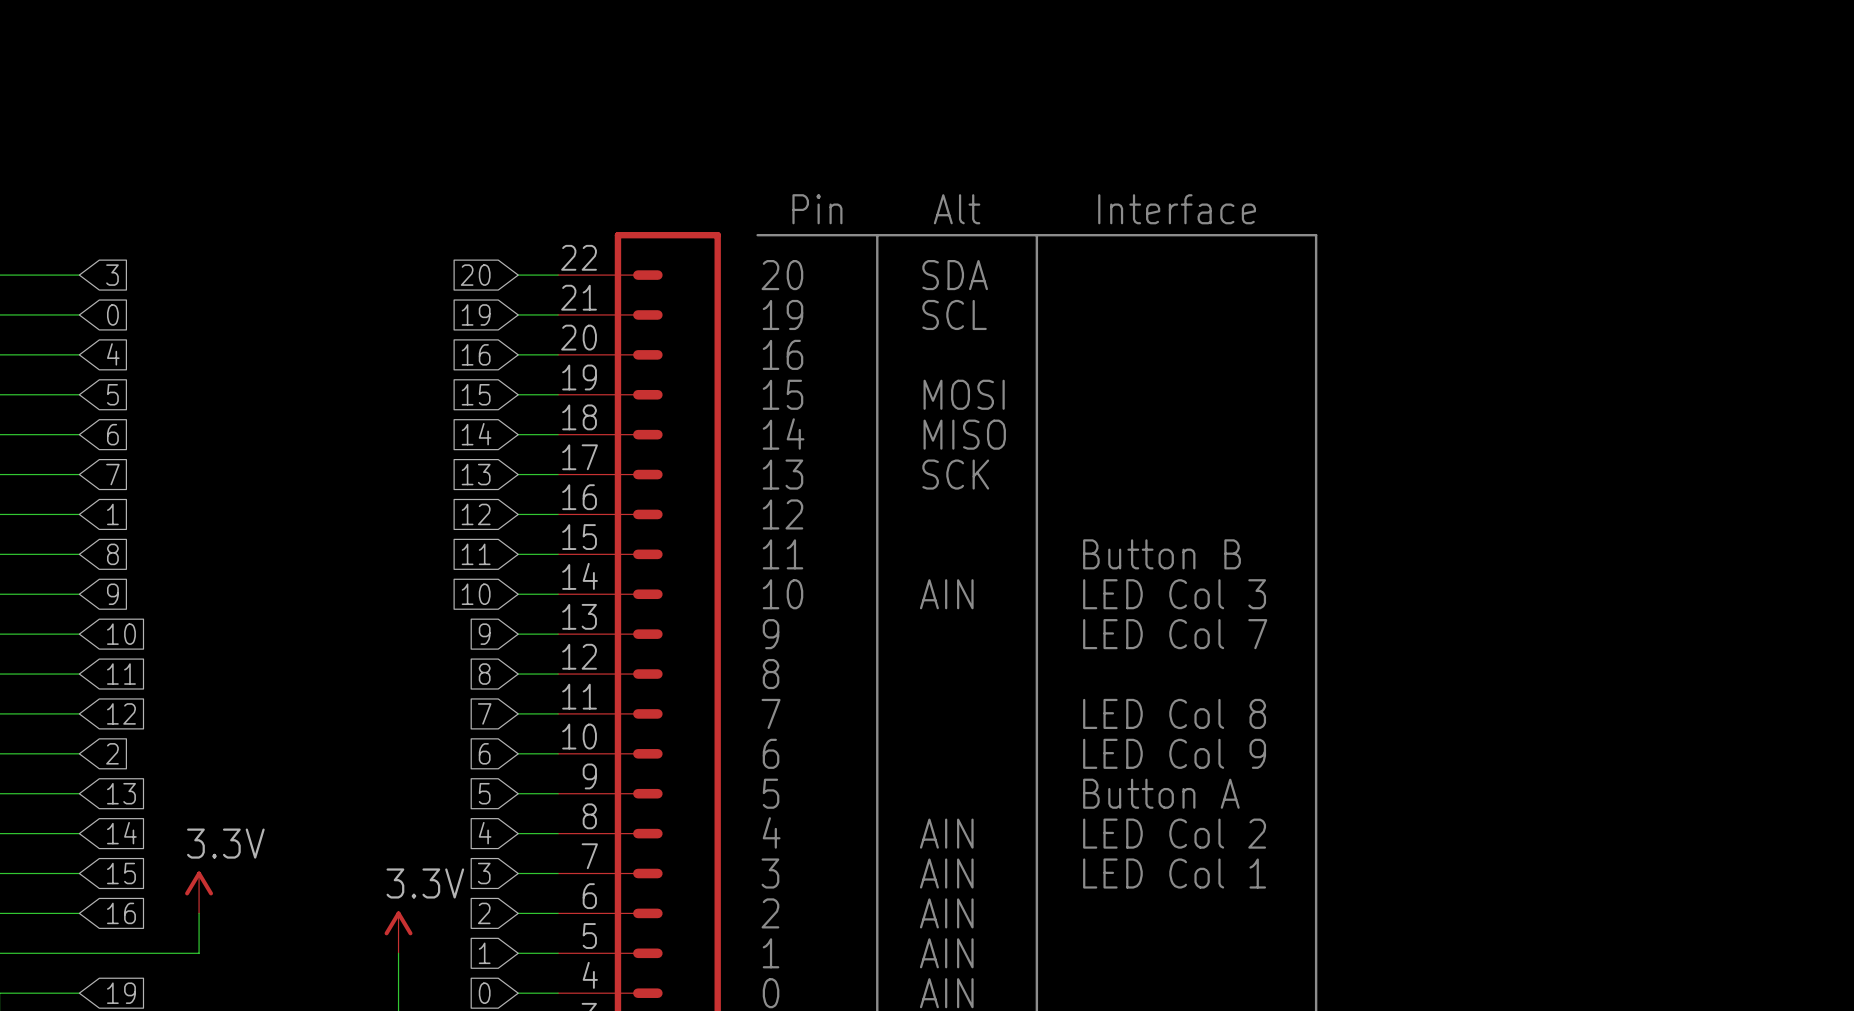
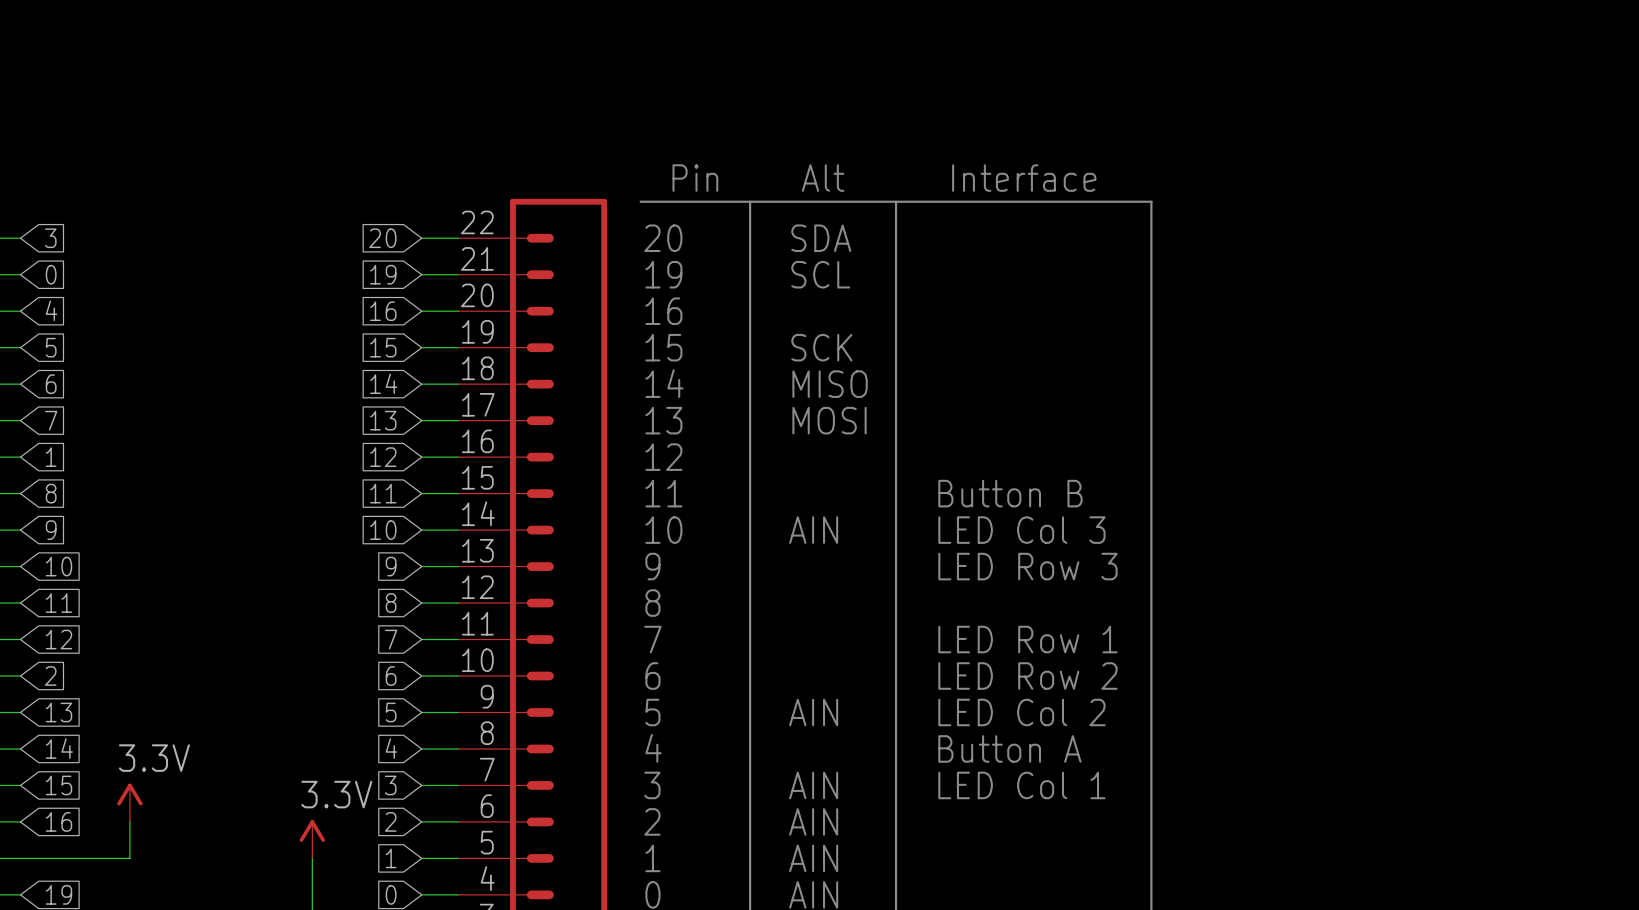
text: MOSI (964, 394) -> SCK (821, 347)
text: SCK (955, 474) -> MOSI (829, 420)
text: LED Col 7 (1175, 634) -> LED Row 3 (1027, 566)
text: LED Col 8 (1174, 713) -> LED Row 1 (1027, 639)
text: LED Col 9 (1174, 753) -> LED Row 2 (1027, 676)
text: Button A (1161, 793) -> LED Col 2 (1021, 712)
text position: AIN (946, 833) -> AIN (813, 712)
text: LED Col 2 (1174, 833) -> Button A (1009, 748)

